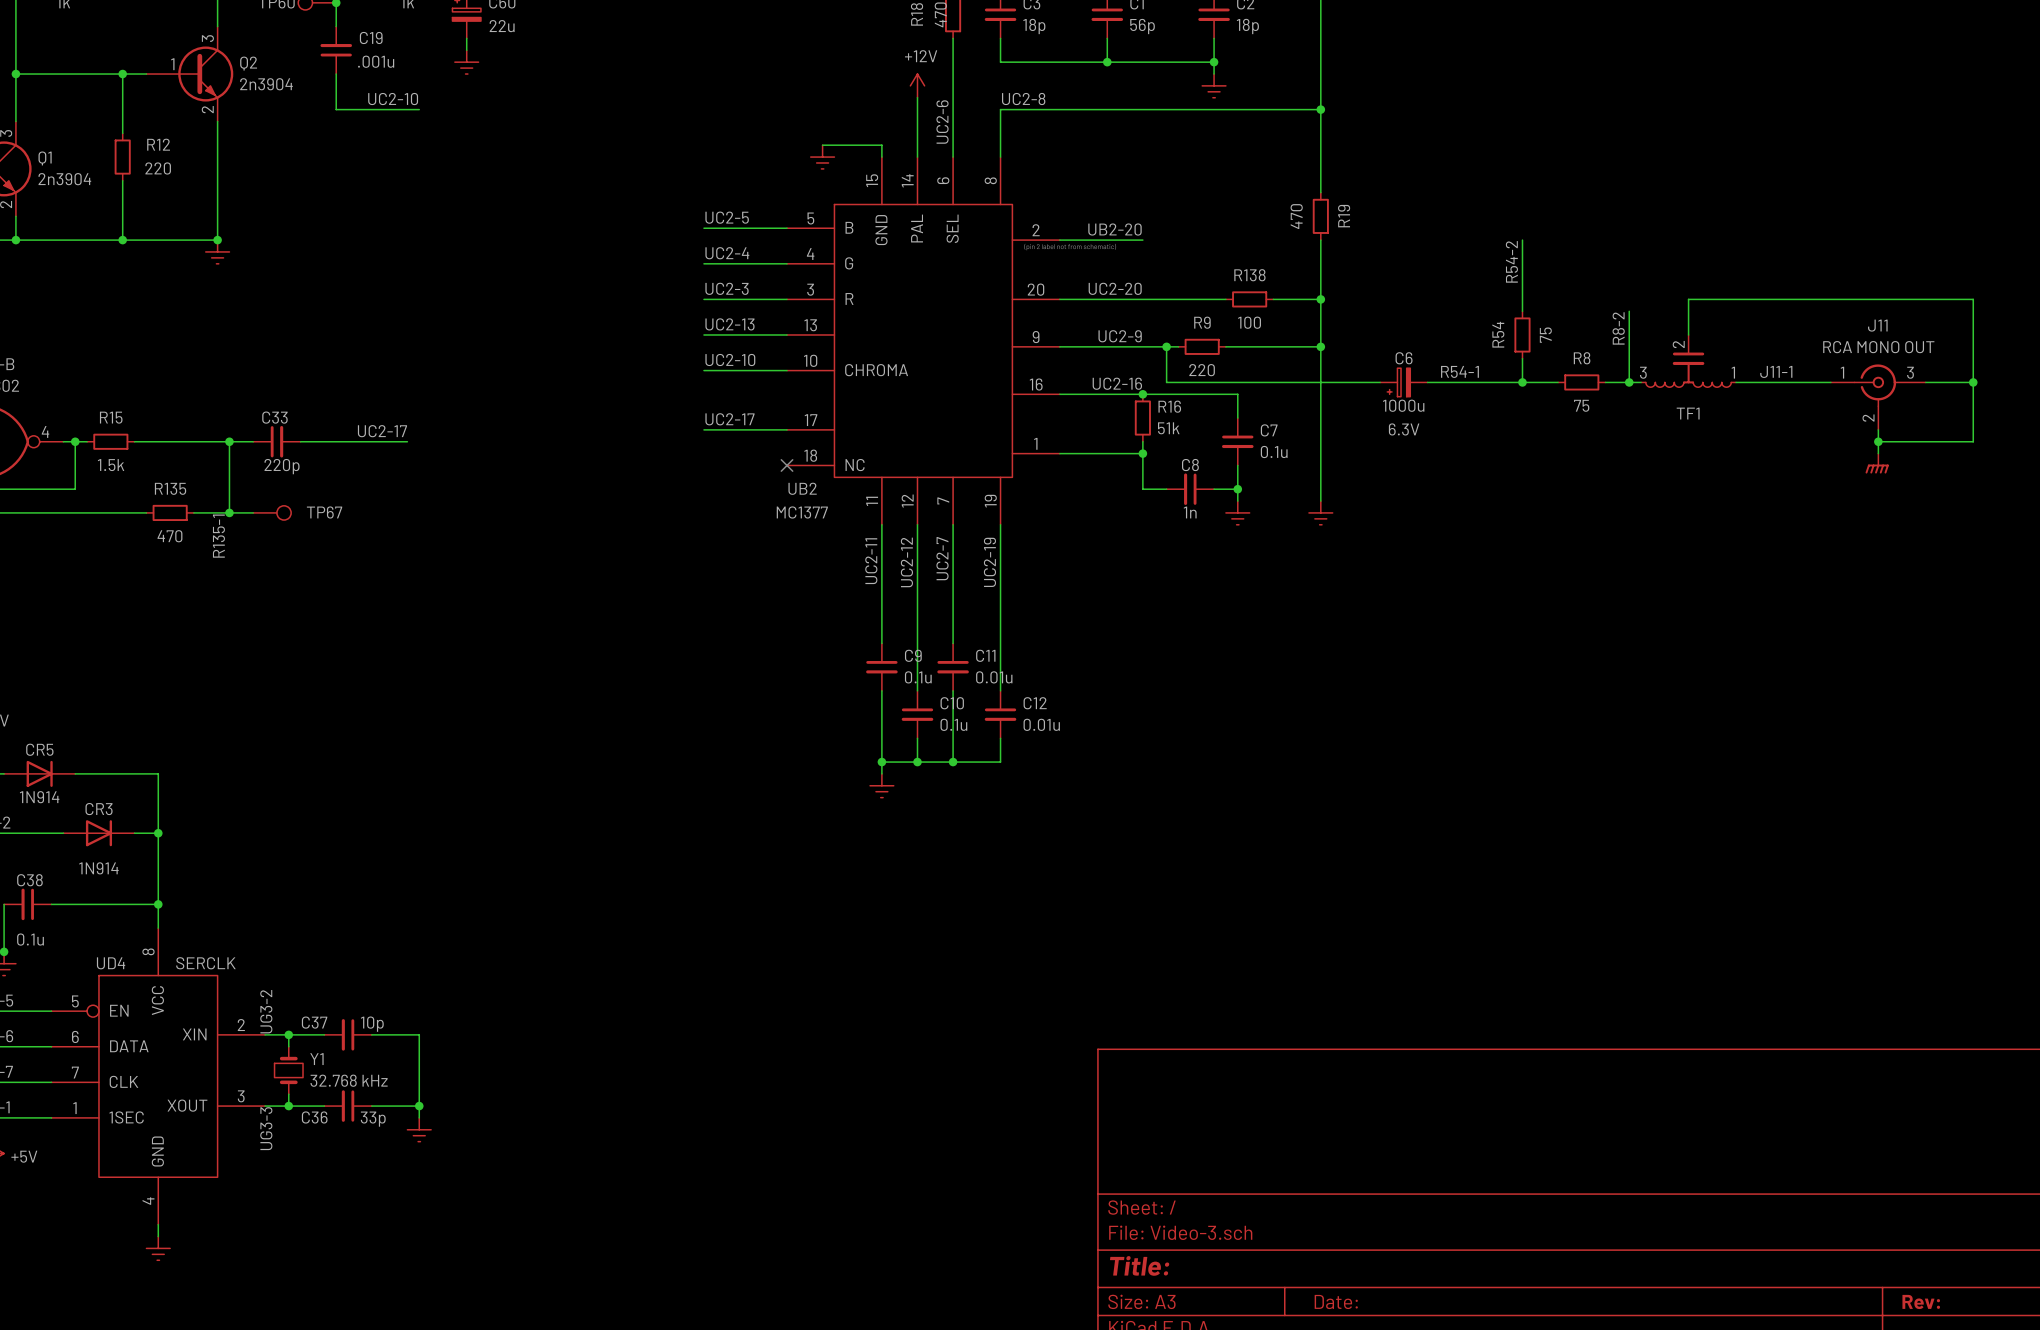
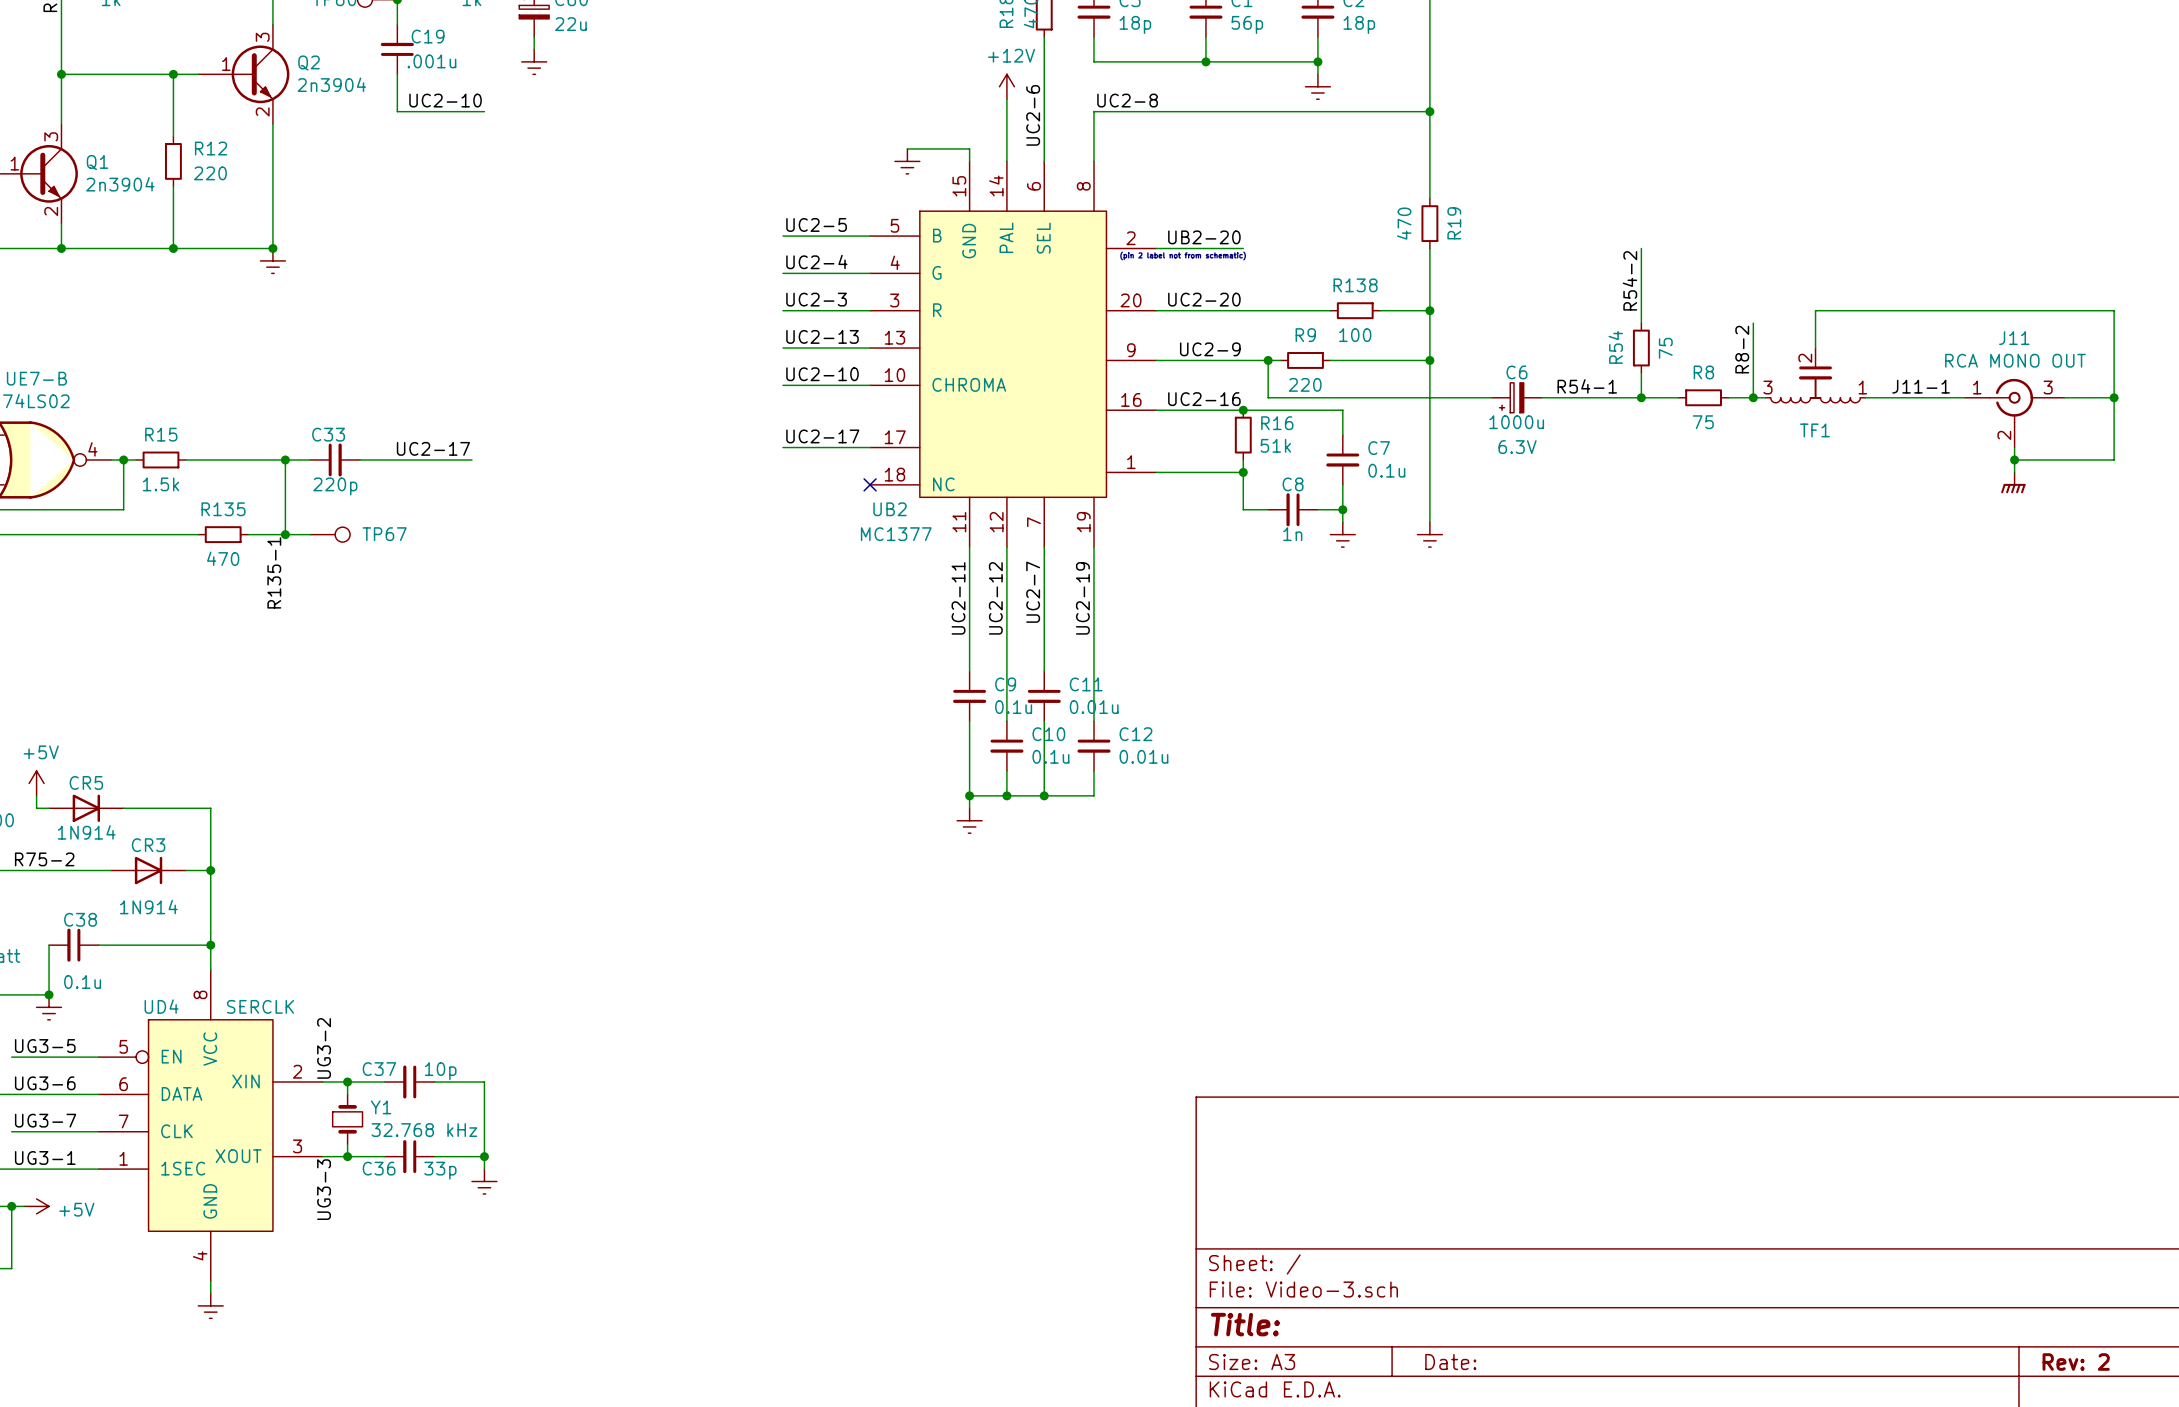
title block: Rev: (1921, 1301) -> Rev: 2 (2076, 1362)

